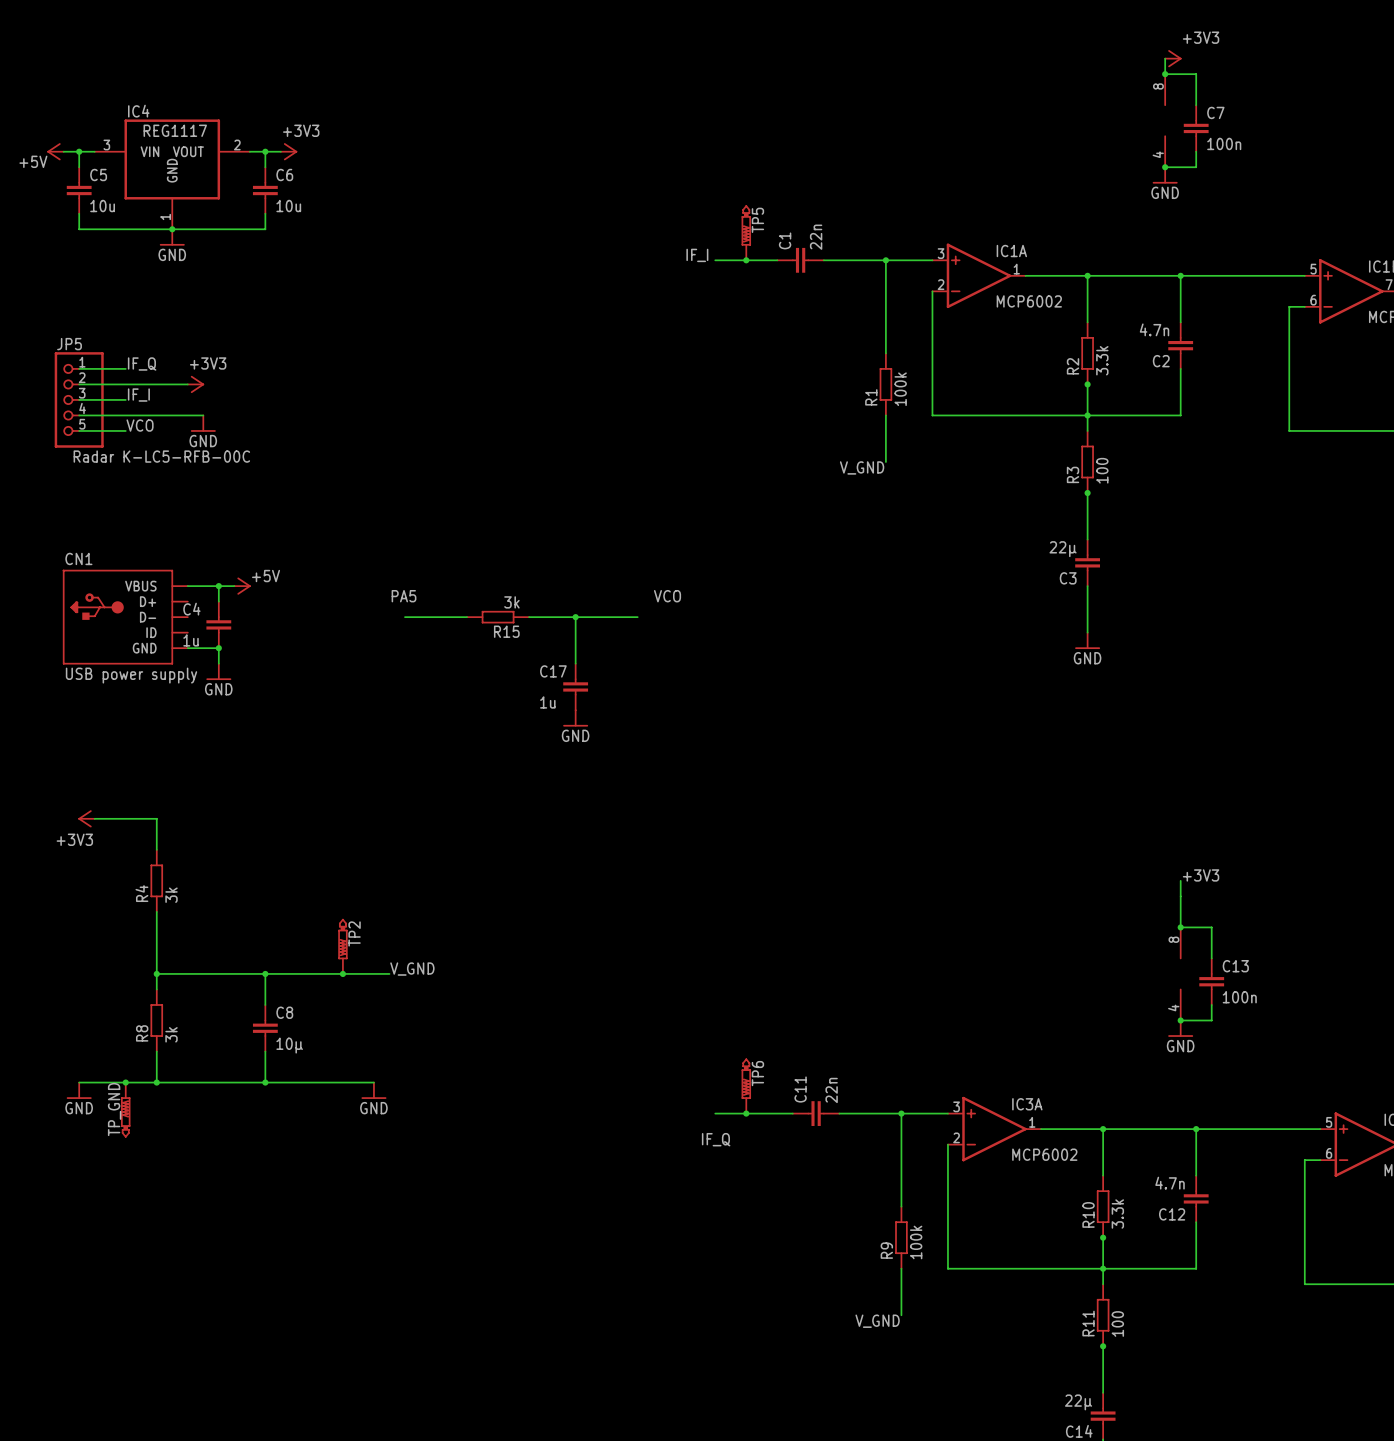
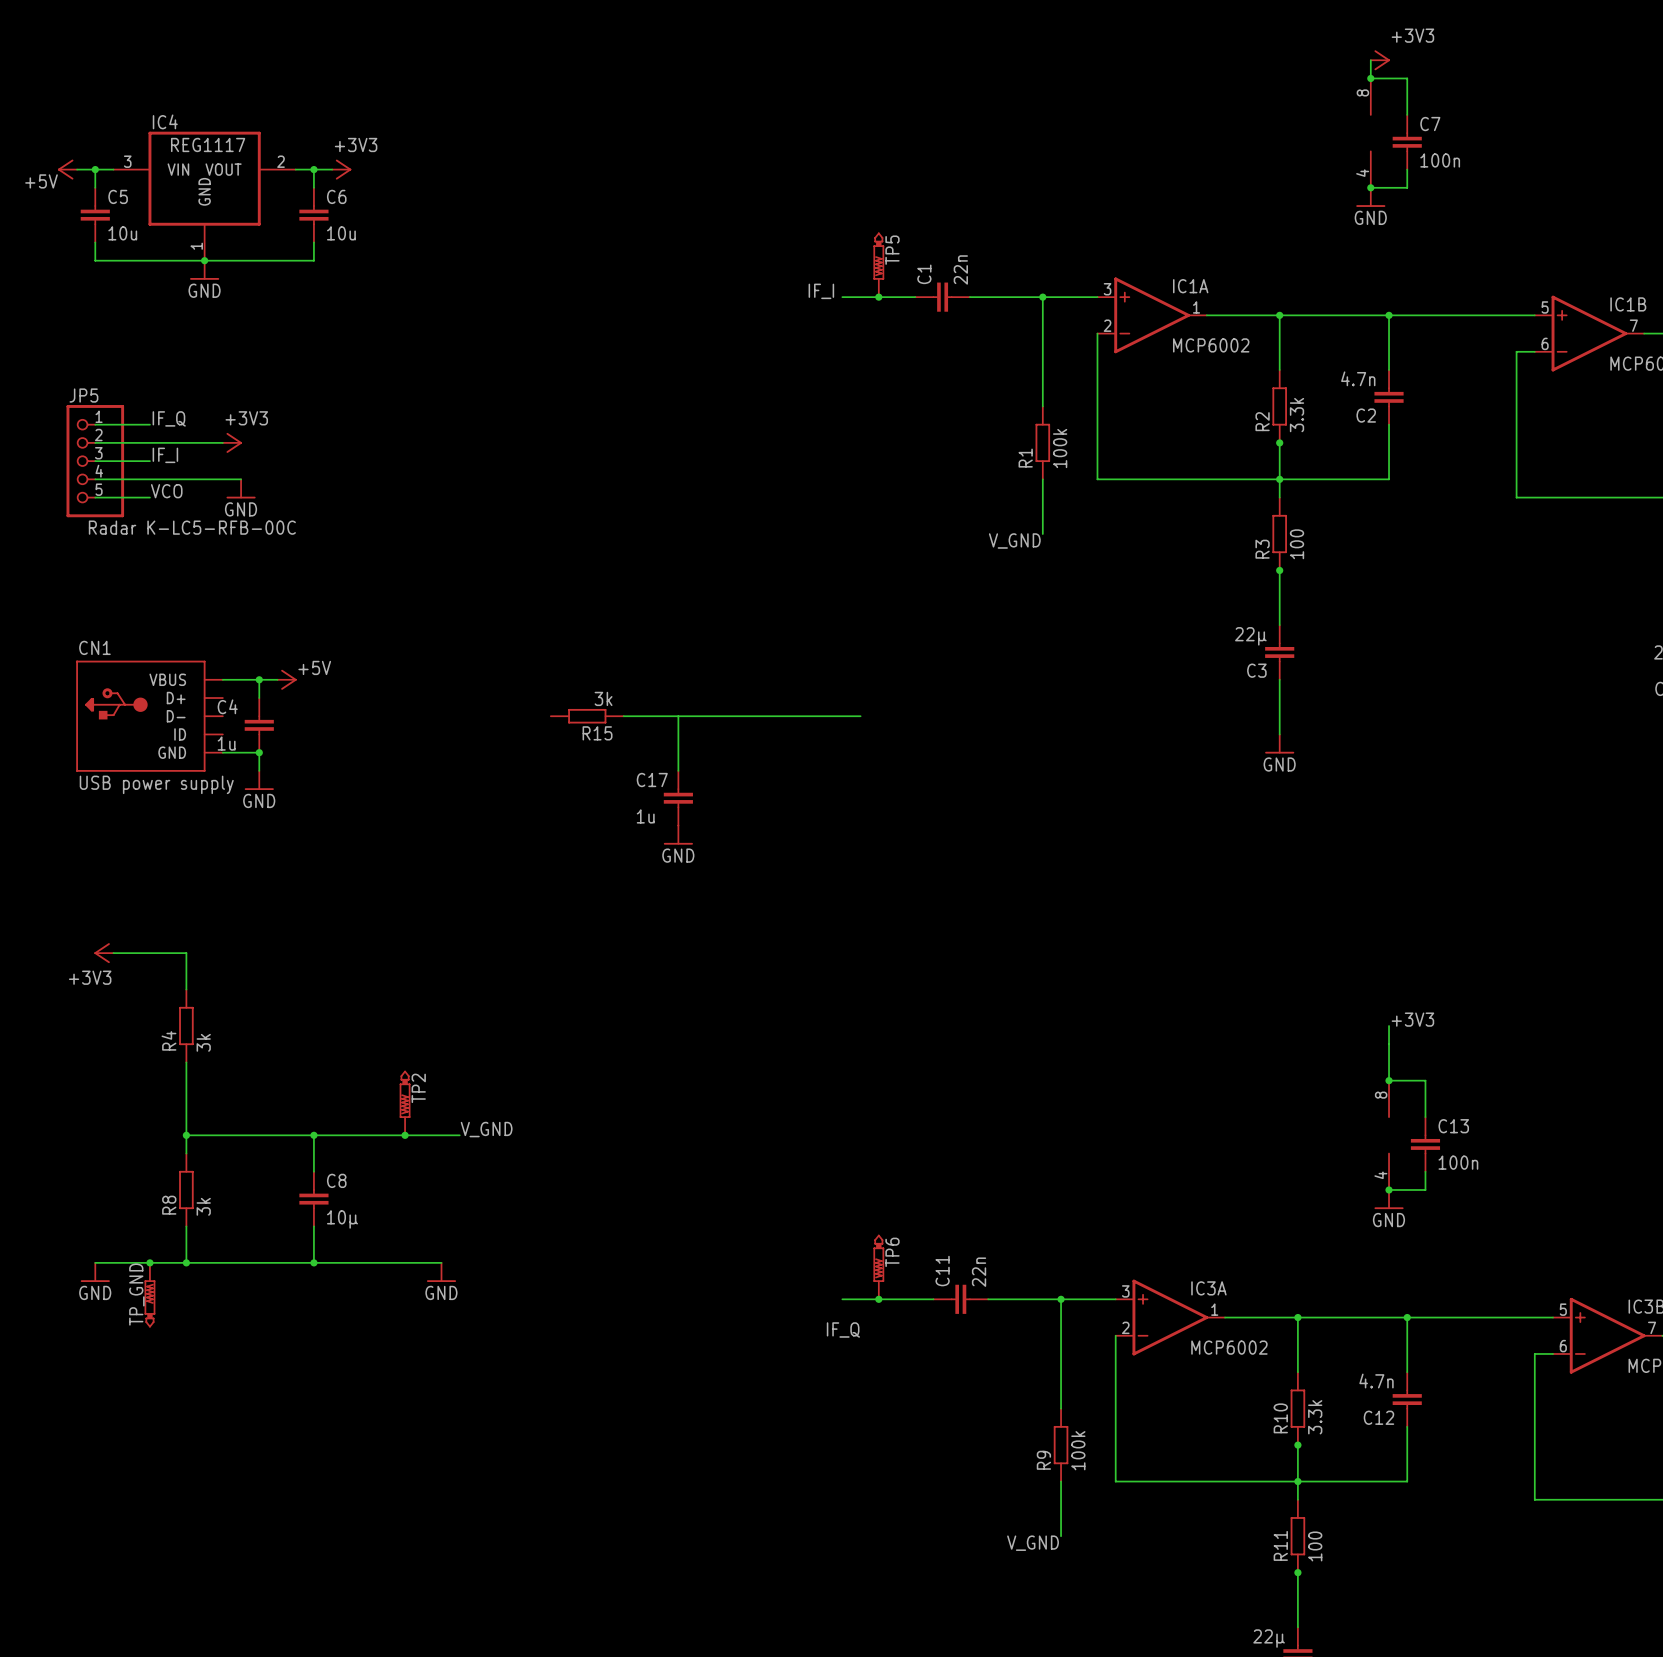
label: PA5 (404, 596) -> none
label: VCO (667, 596) -> none
wire: (404, 617) (467, 617) -> none
junction: (575, 617) -> none
wire: none -> (751, 716) (860, 716)

